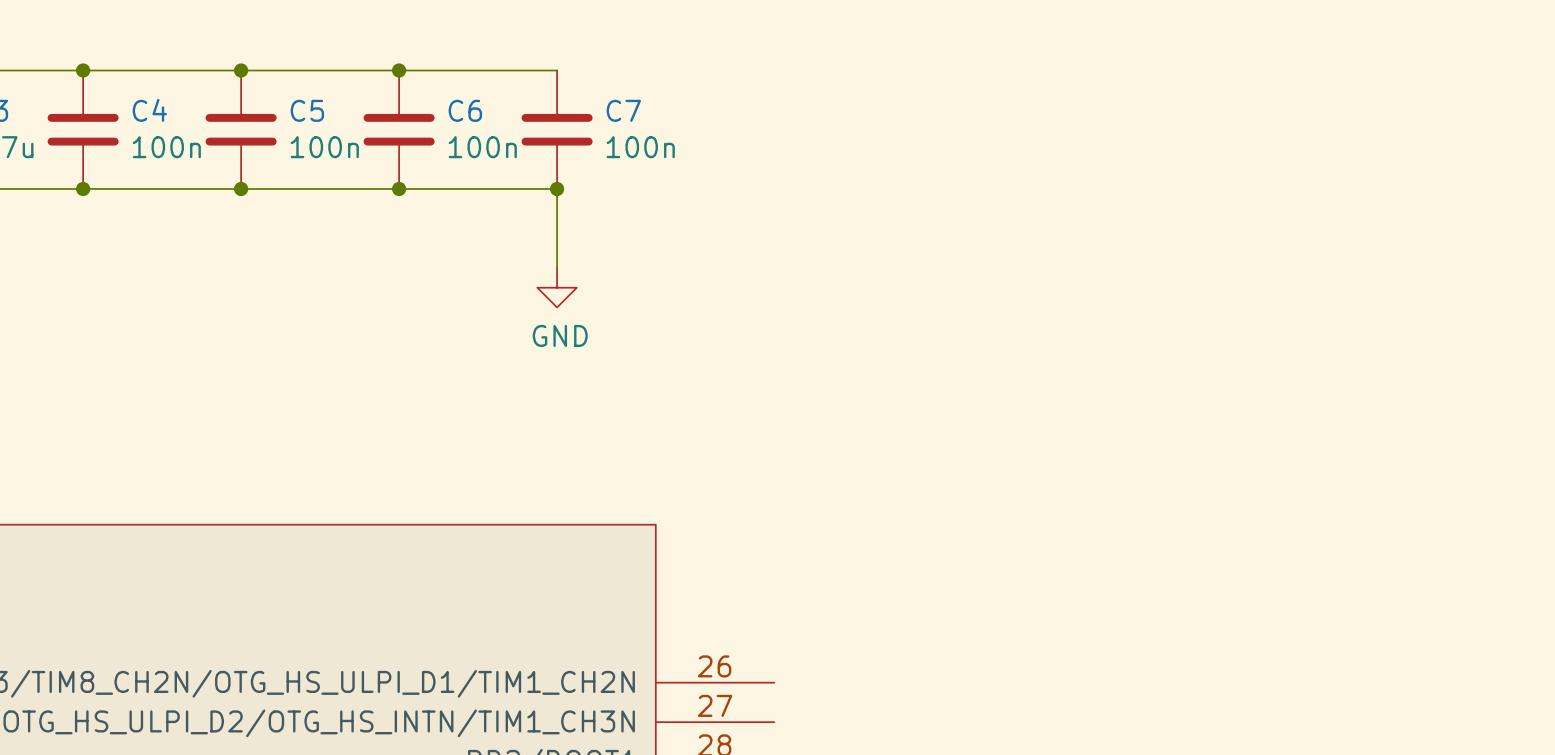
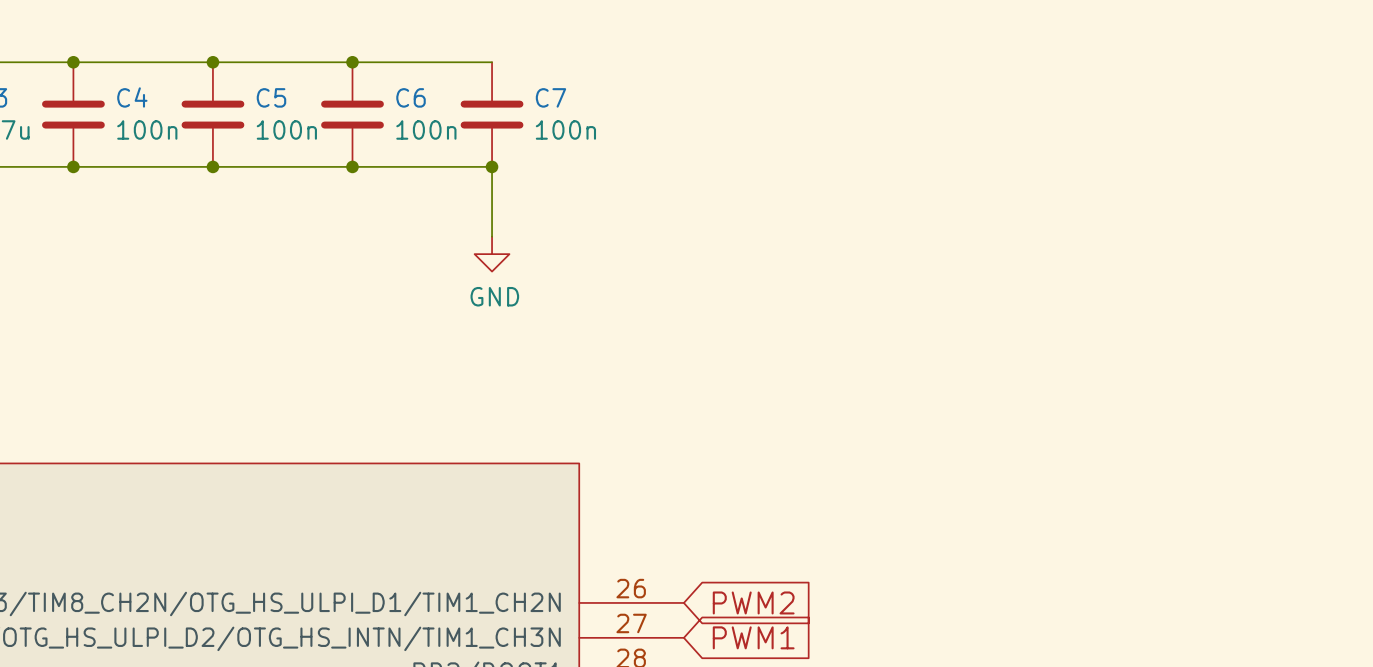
global label: none -> PWM2 (753, 602)
global label: none -> PWM1 (753, 637)

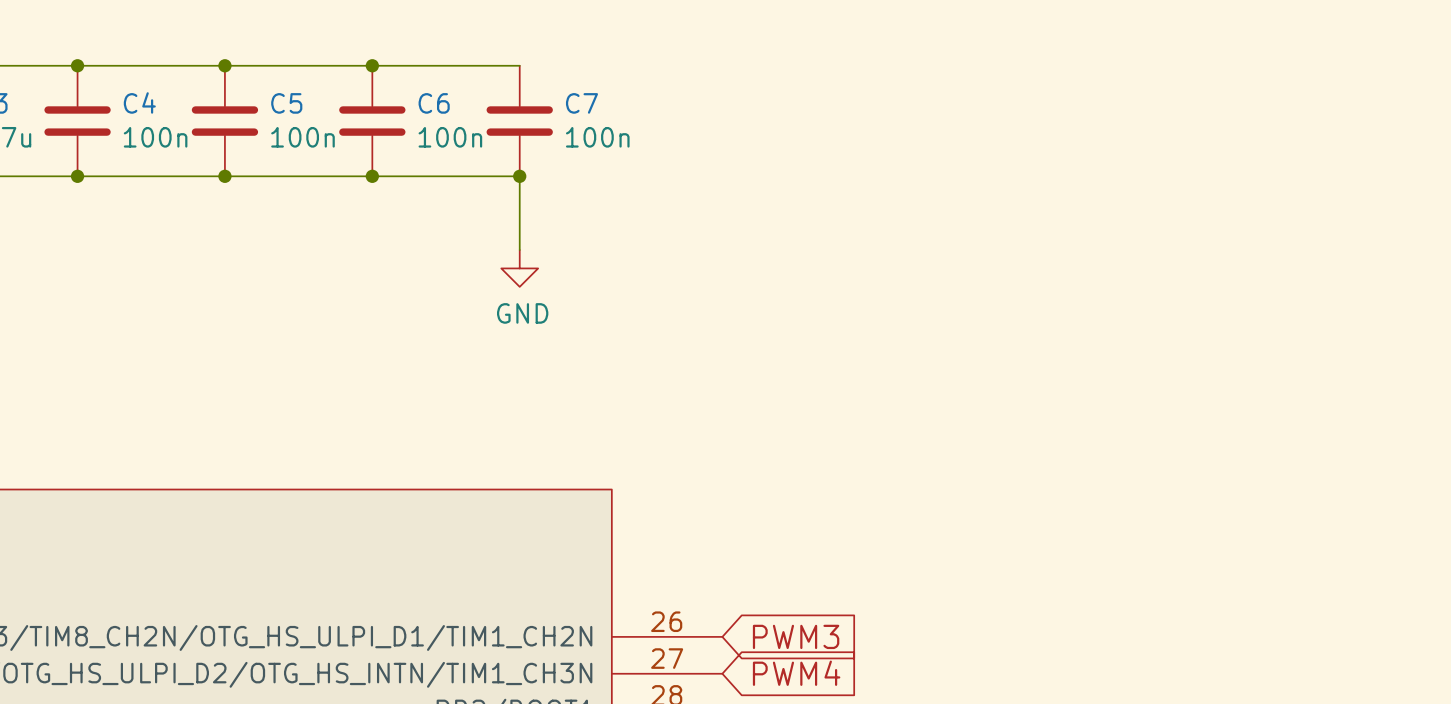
global label: PWM2 (753, 602) -> PWM3 (796, 636)
global label: PWM1 (753, 637) -> PWM4 (796, 673)

